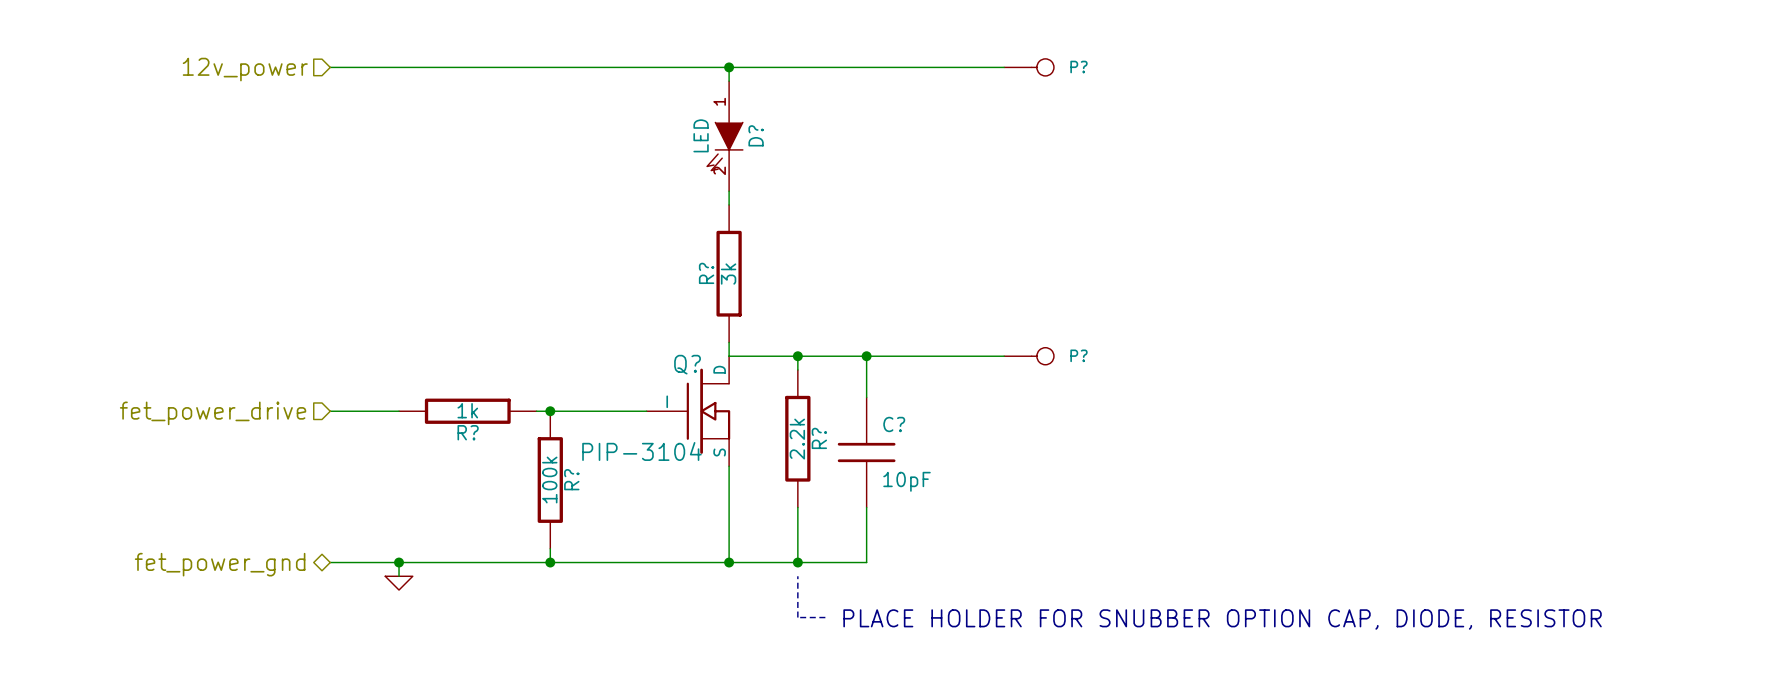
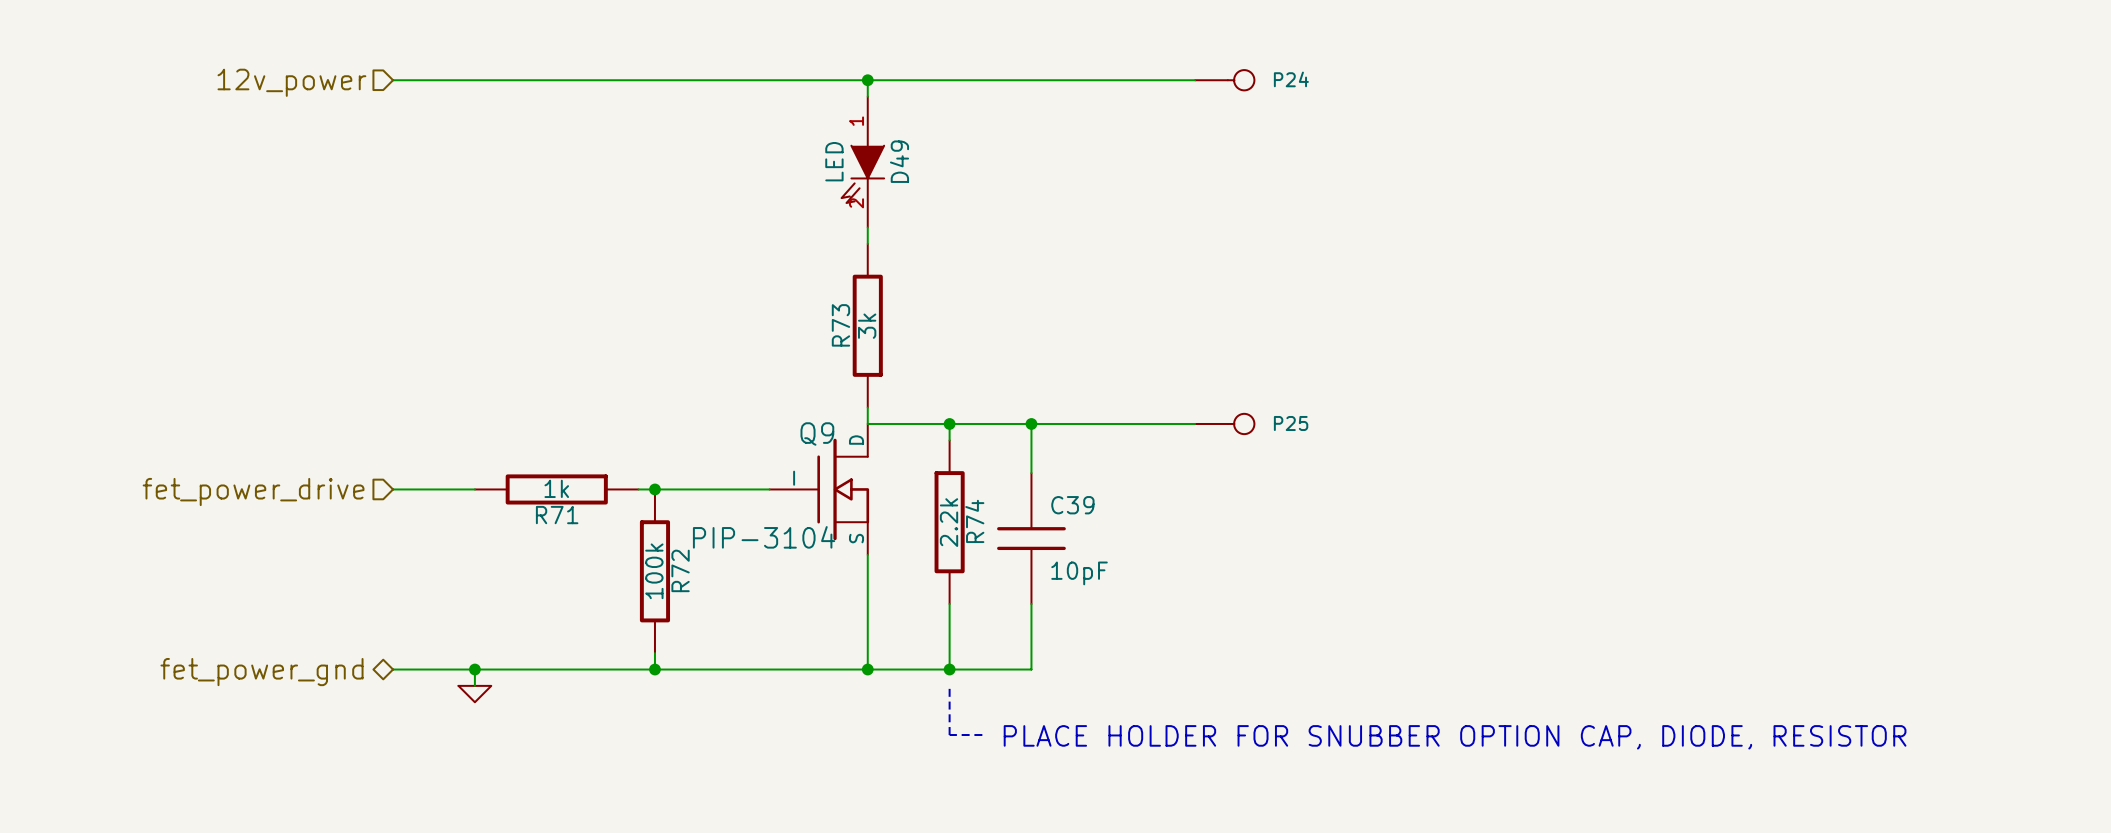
P? name: P? (1078, 67) -> P24 (1291, 79)
D? name: D? (756, 135) -> D49 (899, 161)
R? name: R? (706, 273) -> R73 (840, 325)
P? name: P? (1078, 355) -> P25 (1291, 423)
Q? name: Q? (687, 364) -> Q9 (817, 434)
C? name: C? (894, 424) -> C39 (1072, 505)
R? name: R? (468, 432) -> R71 (557, 515)
R? name: R? (819, 438) -> R74 (974, 521)
R? name: R? (571, 479) -> R72 (680, 570)

